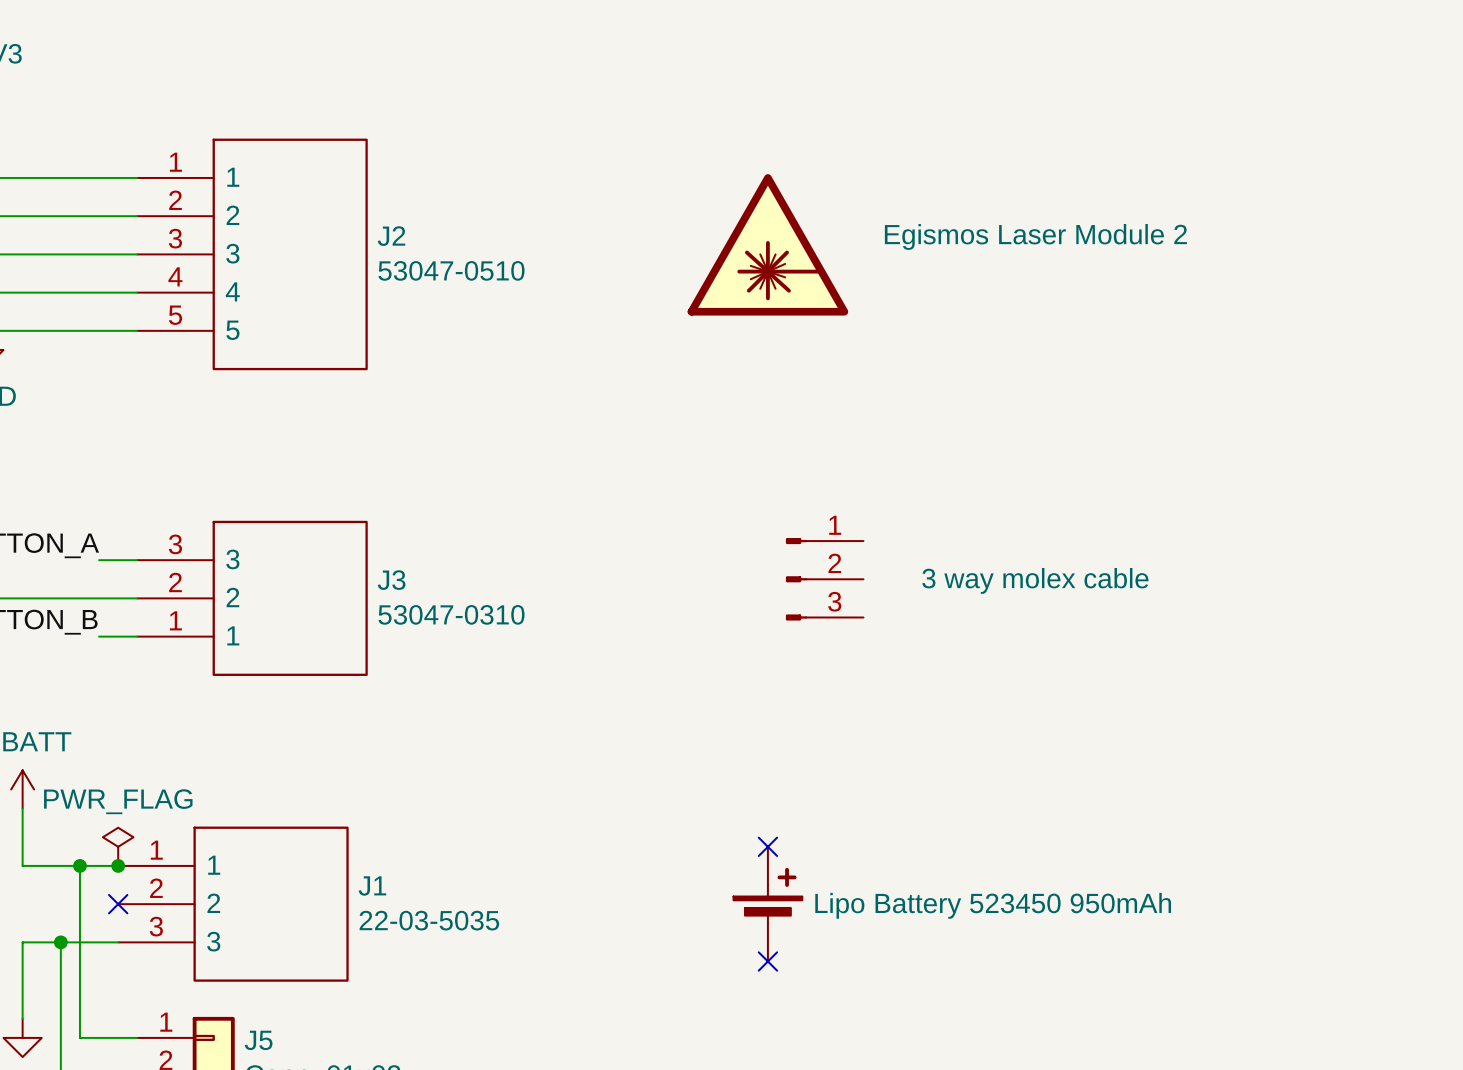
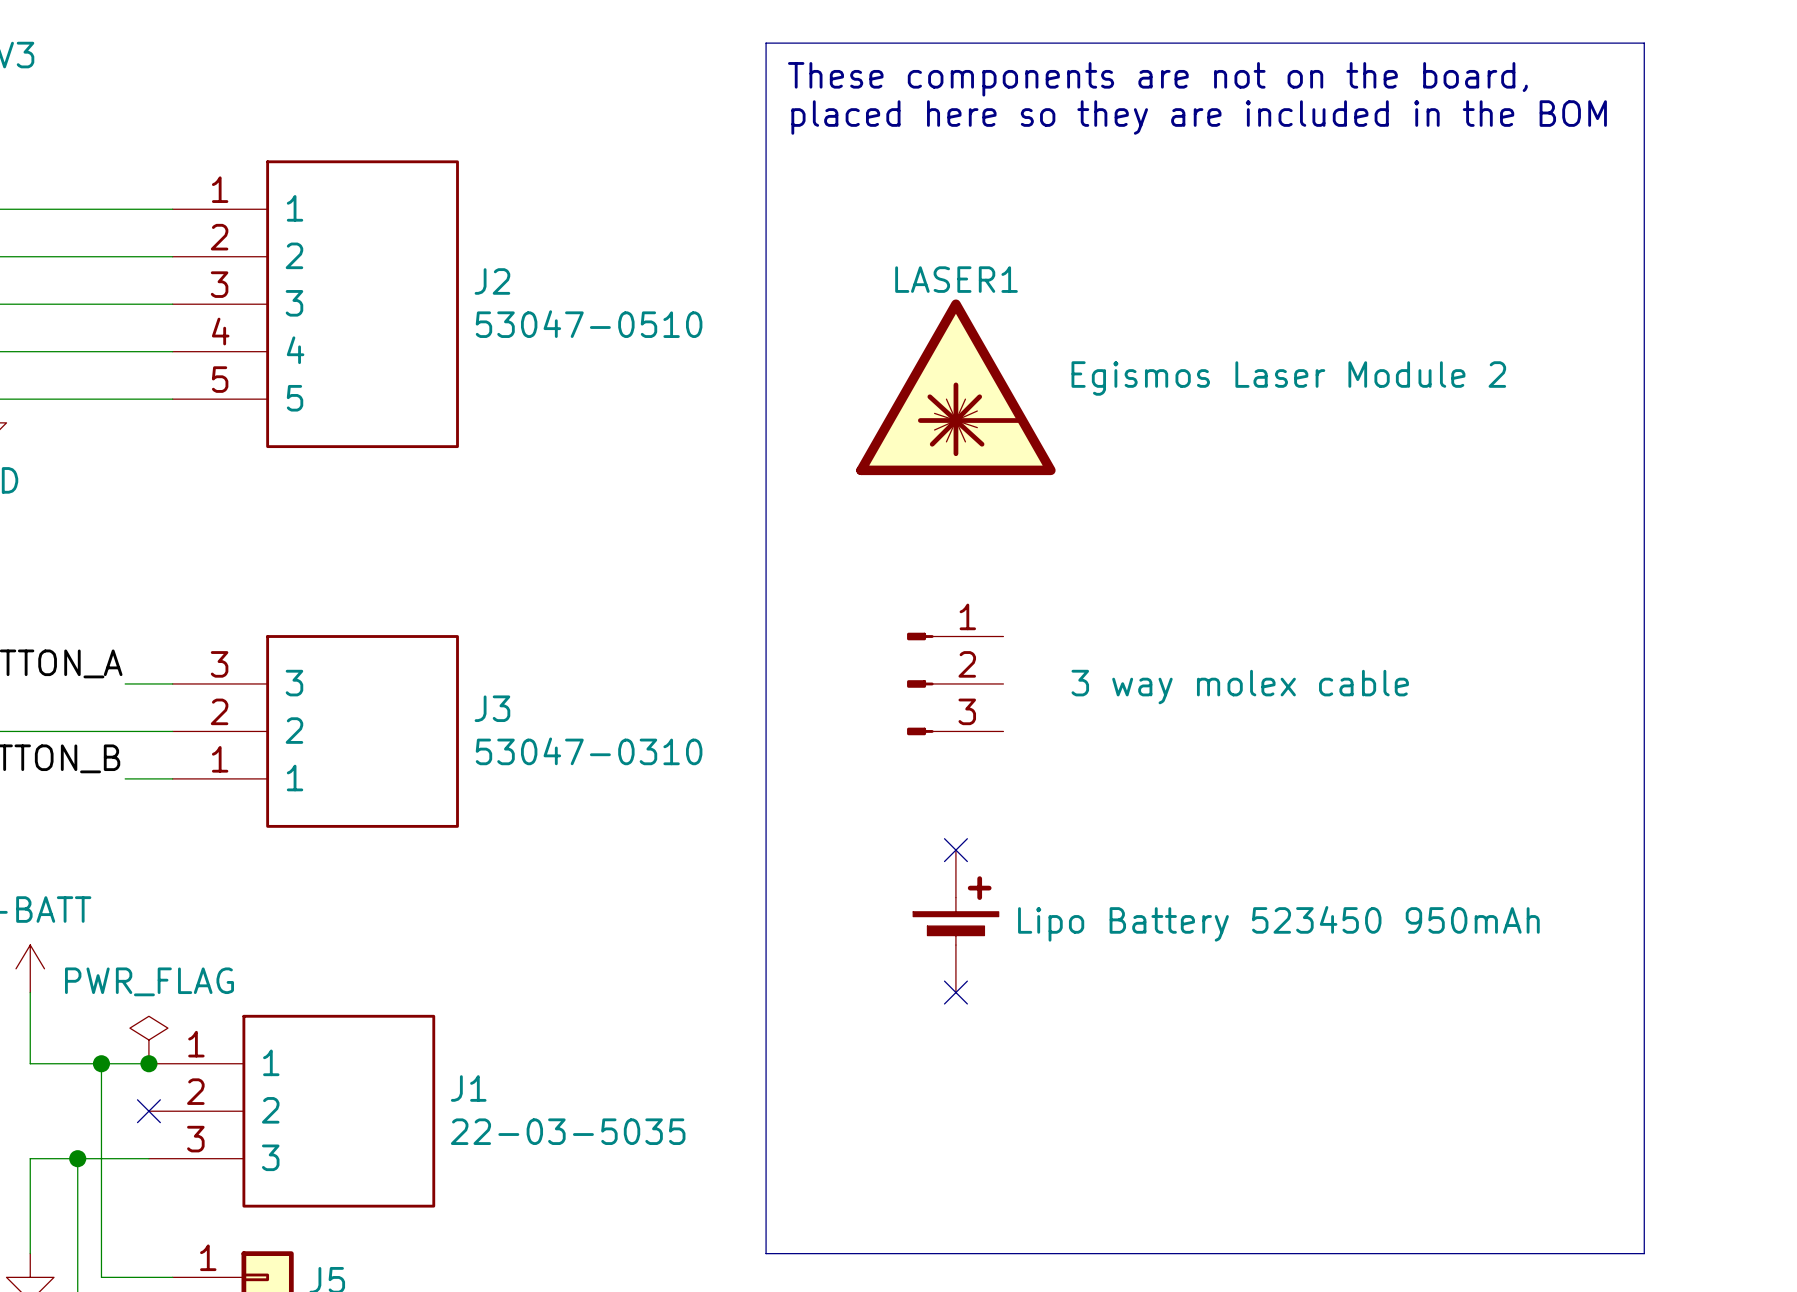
line: none -> (766, 43) (1644, 43) (1644, 1253) (766, 1253) (766, 43)
text: none -> These components are not on the board, (1157, 79)
text: none -> placed here so they are included in the BOM (1199, 117)
power symbol: Egismos Laser Module 2 (767, 244) -> none
LASER1: none -> Egismos Laser Module 2 (955, 387)
part position: (824, 579) -> (955, 683)
part value position: 3 way molex cable (1035, 580) -> 3 way molex cable (1240, 687)
no-connect mark: none -> (955, 850)
no-connect mark position: (767, 846) -> (955, 992)
part position: (767, 904) -> (955, 921)
no-connect mark: (767, 961) -> none

